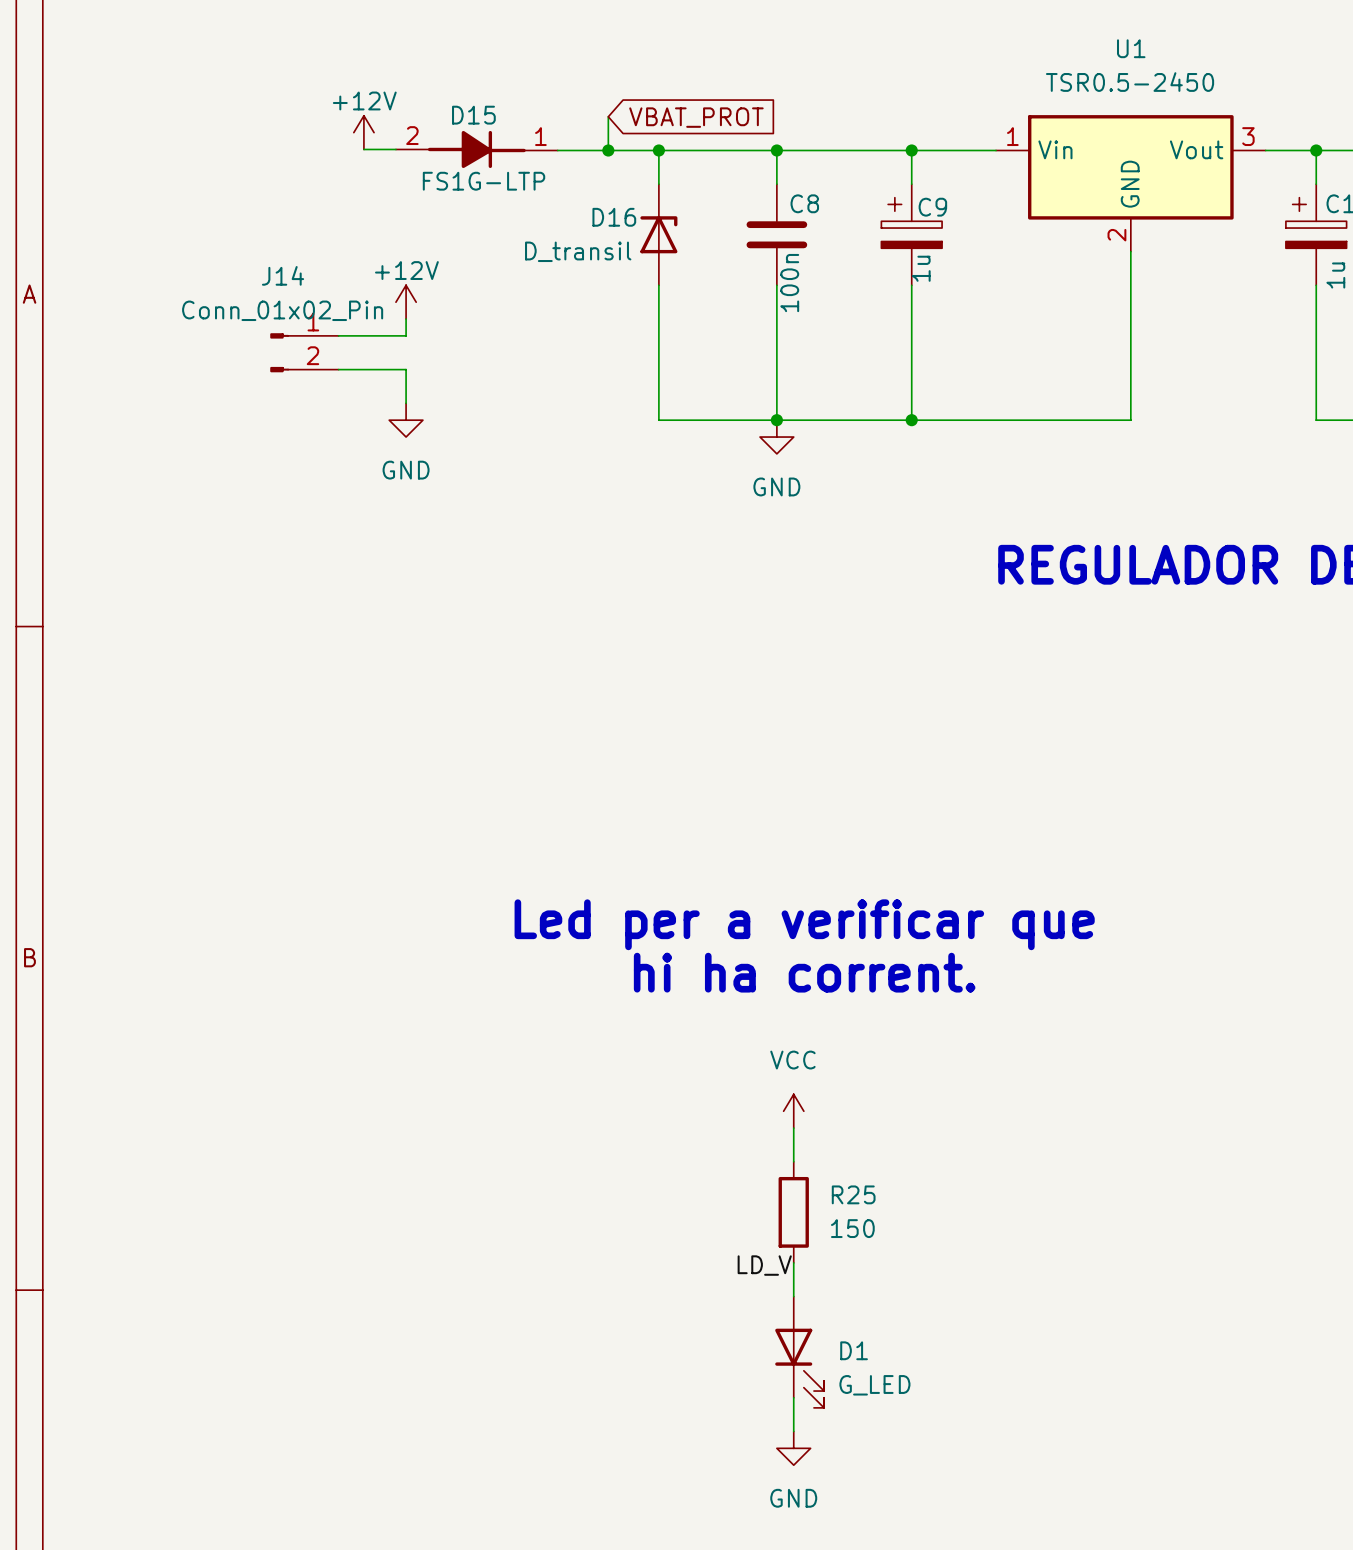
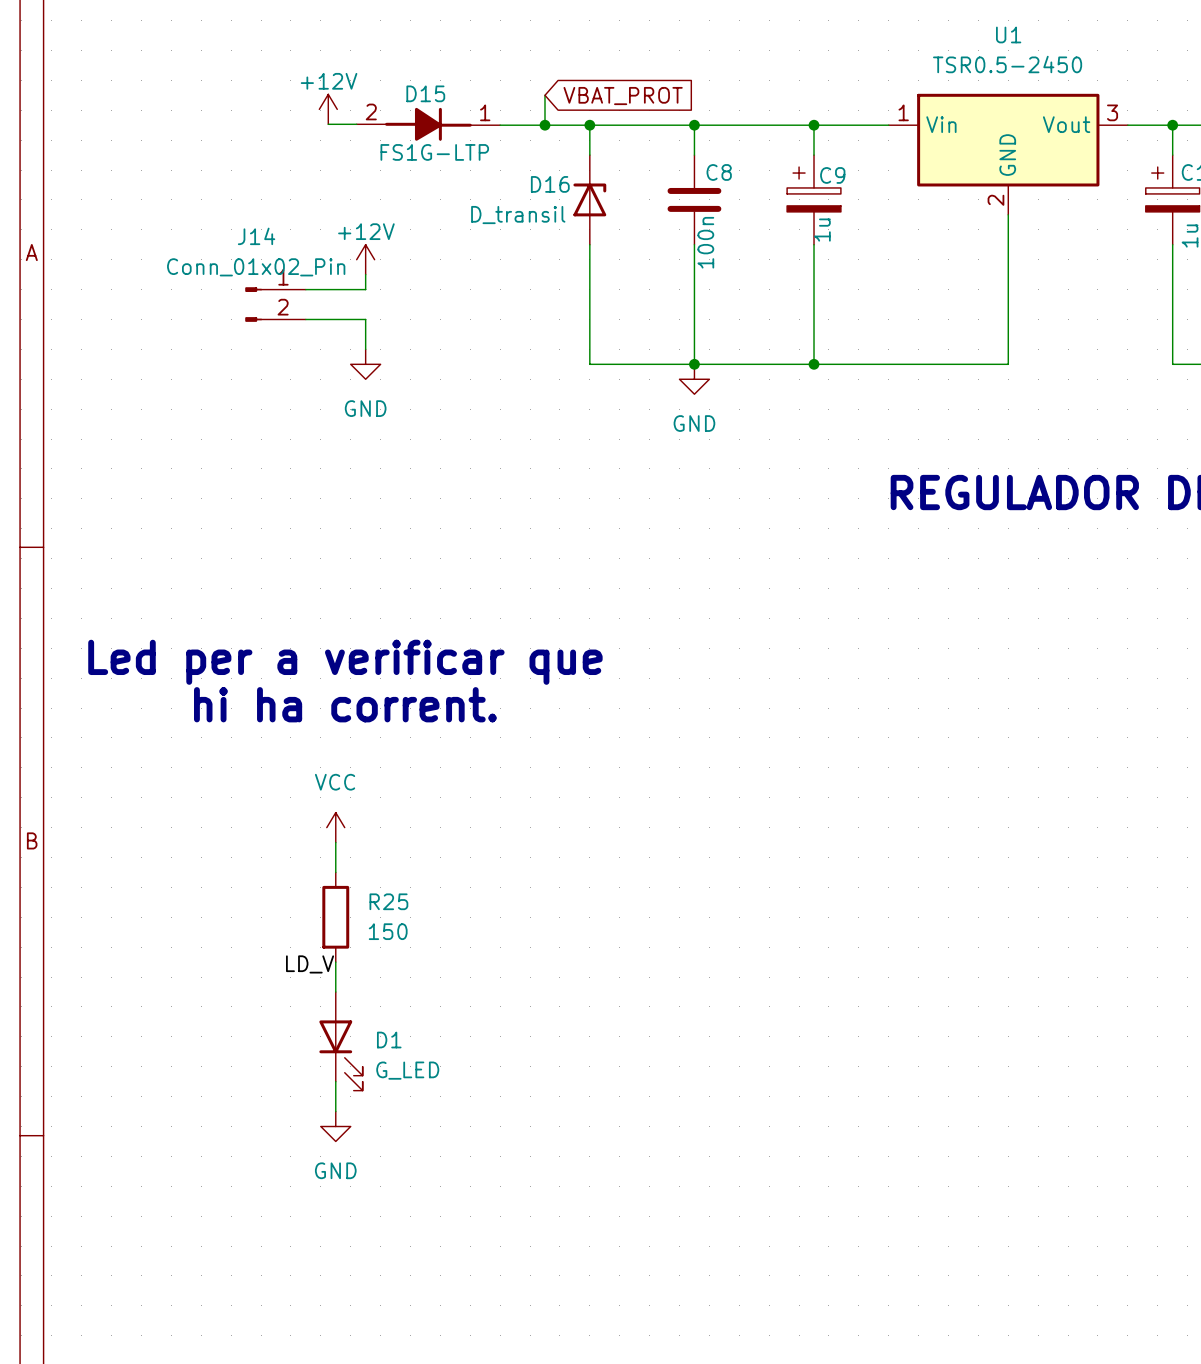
text: none -> Led per a verificar que (345, 662)
text: none -> hi ha corrent. (345, 704)
text: Led per a verificar que (804, 924) -> none
power symbol: none -> VCC (335, 827)
wire: none -> (335, 842) (335, 872)
text: hi ha corrent. (804, 972) -> none
wire: none -> (335, 962) (335, 992)
label: none -> LD_V (310, 964)
power symbol: VCC (793, 1111) -> none
wire: (793, 1128) (793, 1161) -> none
R25 position: (793, 1212) -> (335, 917)
wire: none -> (335, 1081) (335, 1111)
wire: (793, 1262) (793, 1296) -> none
label: LD_V (764, 1265) -> none
power symbol: none -> GND (335, 1126)
D1 position: (799, 1352) -> (341, 1041)
wire: (793, 1397) (793, 1431) -> none
power symbol: GND (793, 1448) -> none

